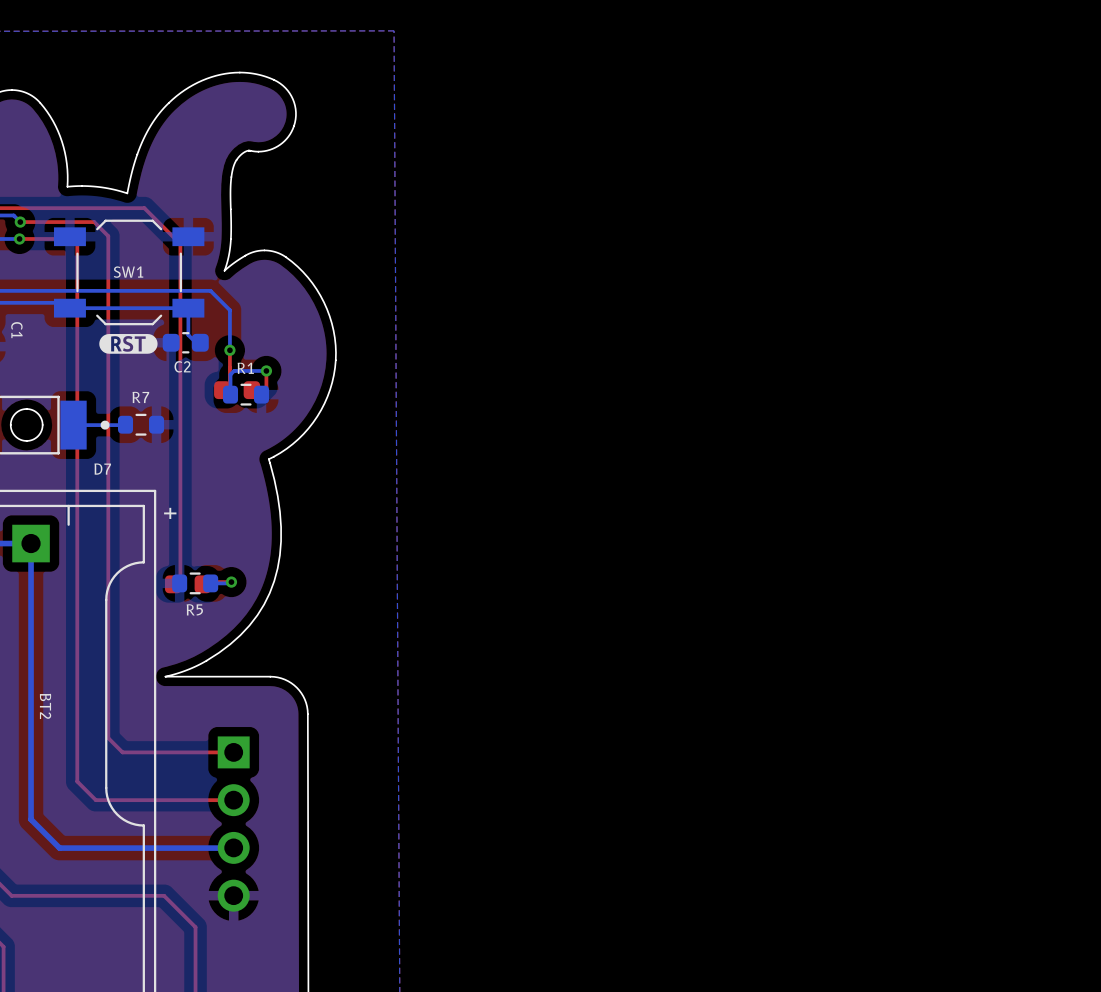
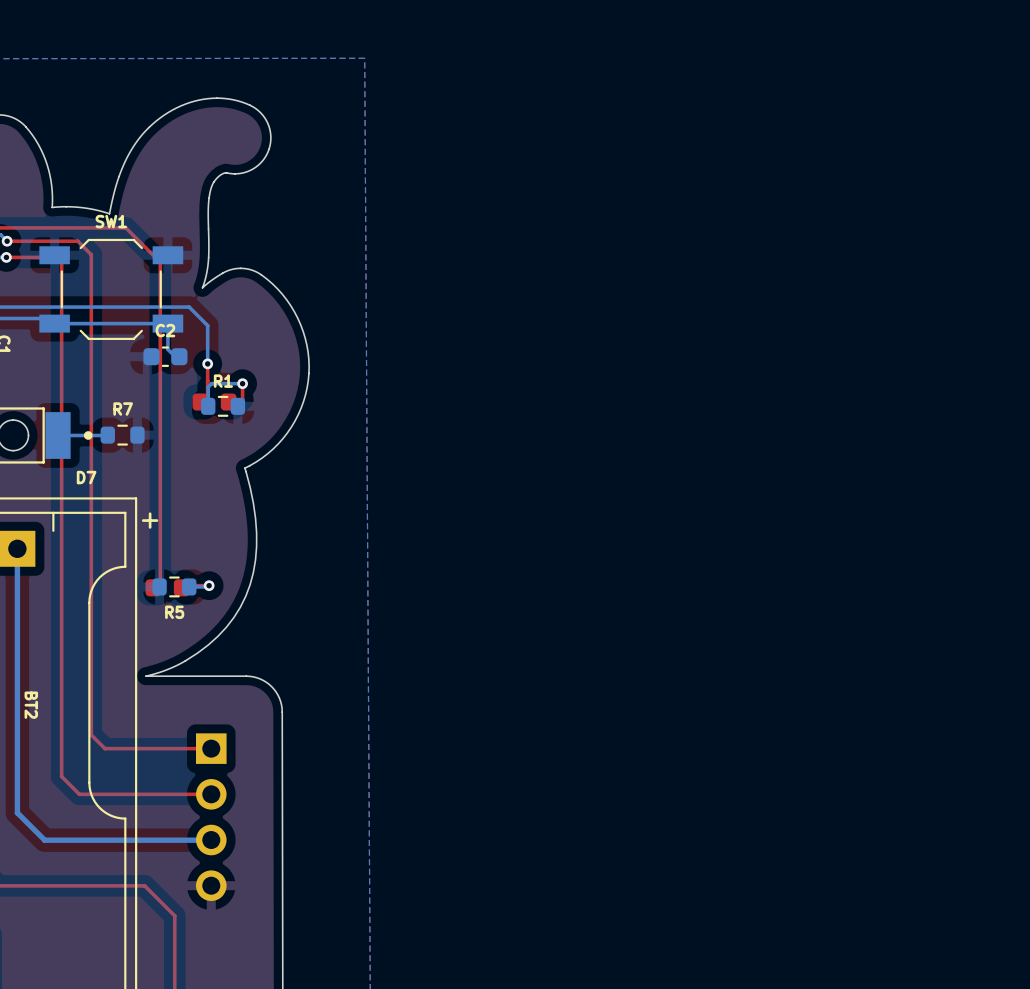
SW1 name position: SW1 (128, 272) -> SW1 (111, 221)
drawing: [99, 334, 158, 354] -> none
C2 name position: C2 (182, 366) -> C2 (165, 330)

